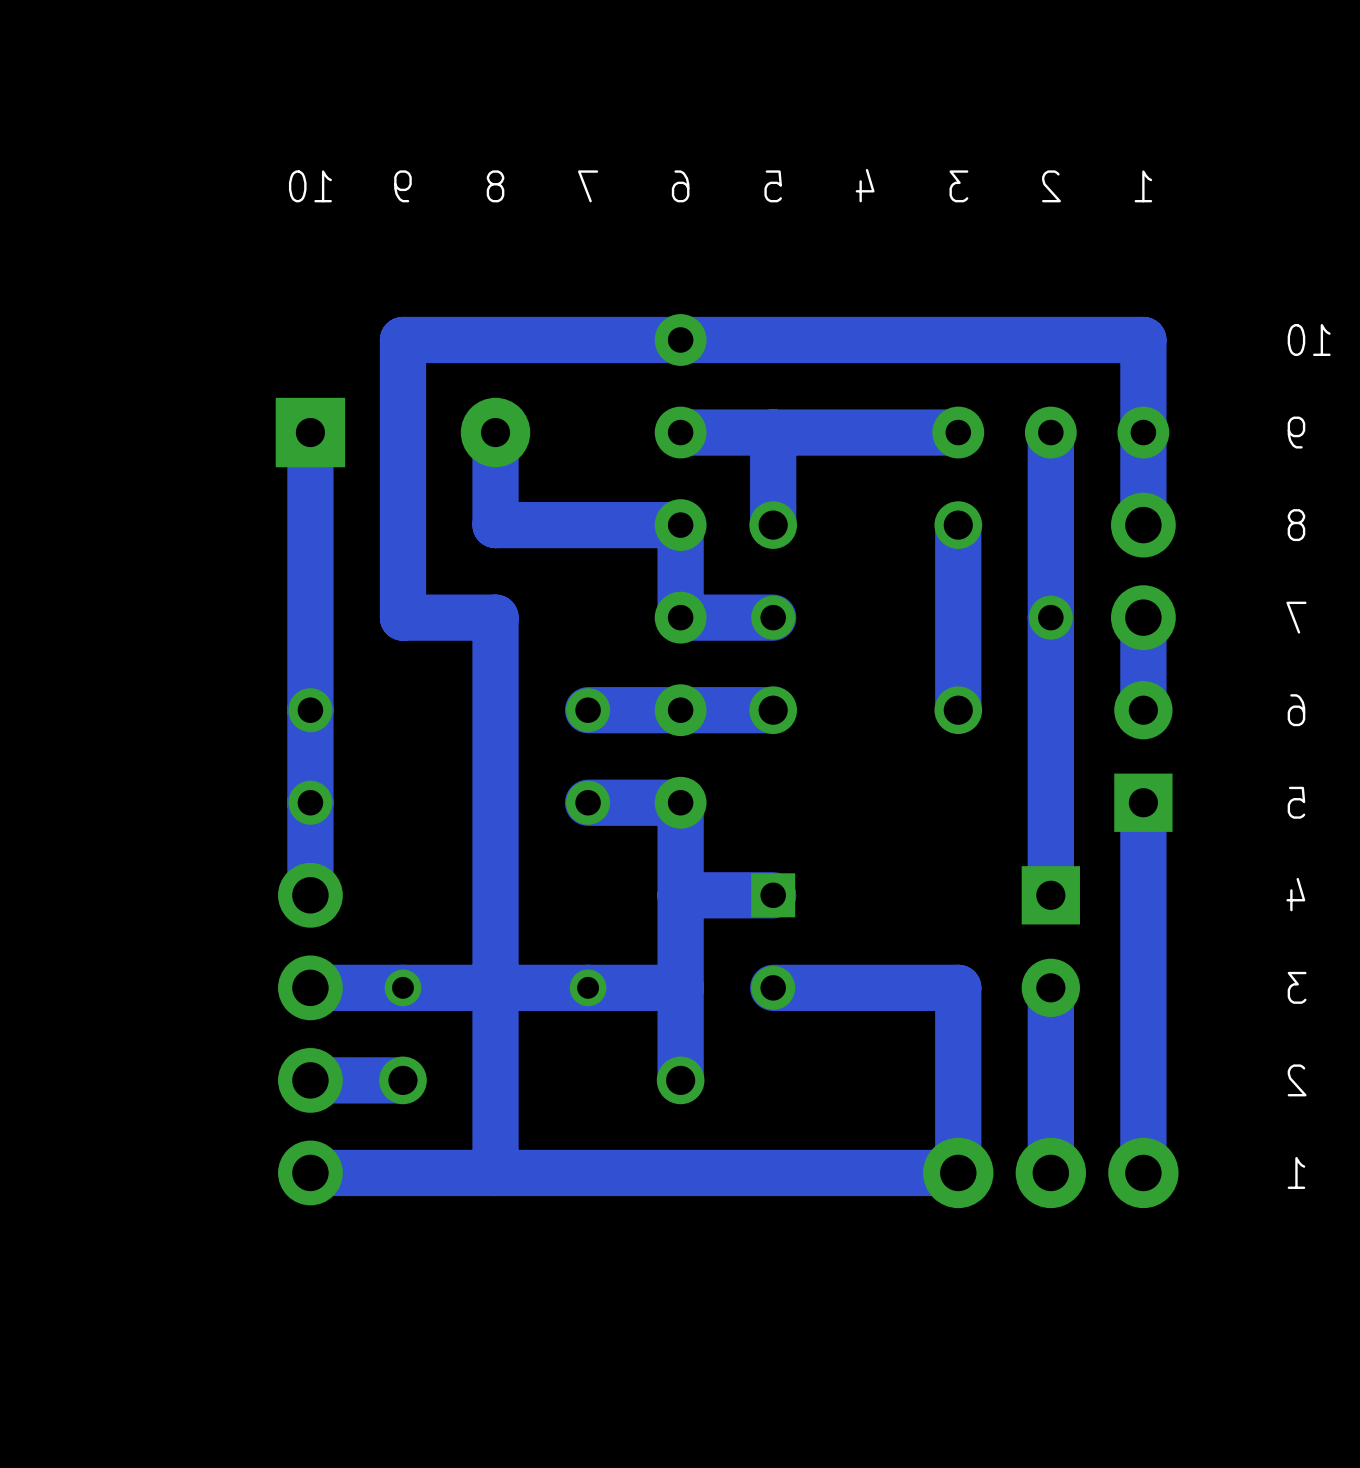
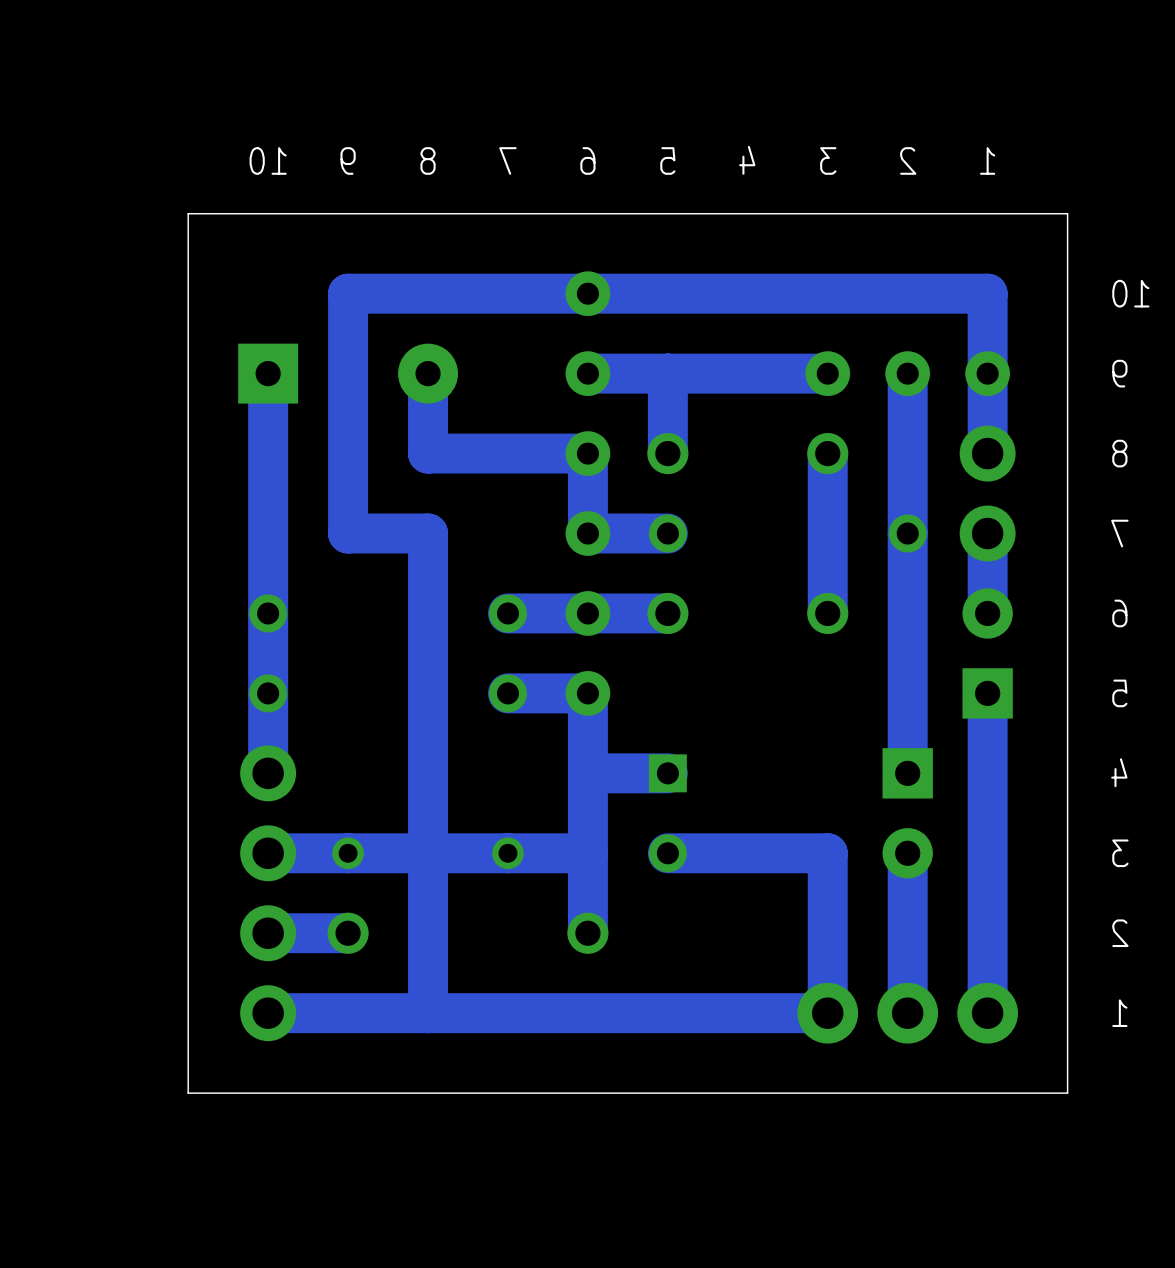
board edge: none -> (1067, 213) (188, 213) (188, 1093) (1067, 1093) (1067, 213)

